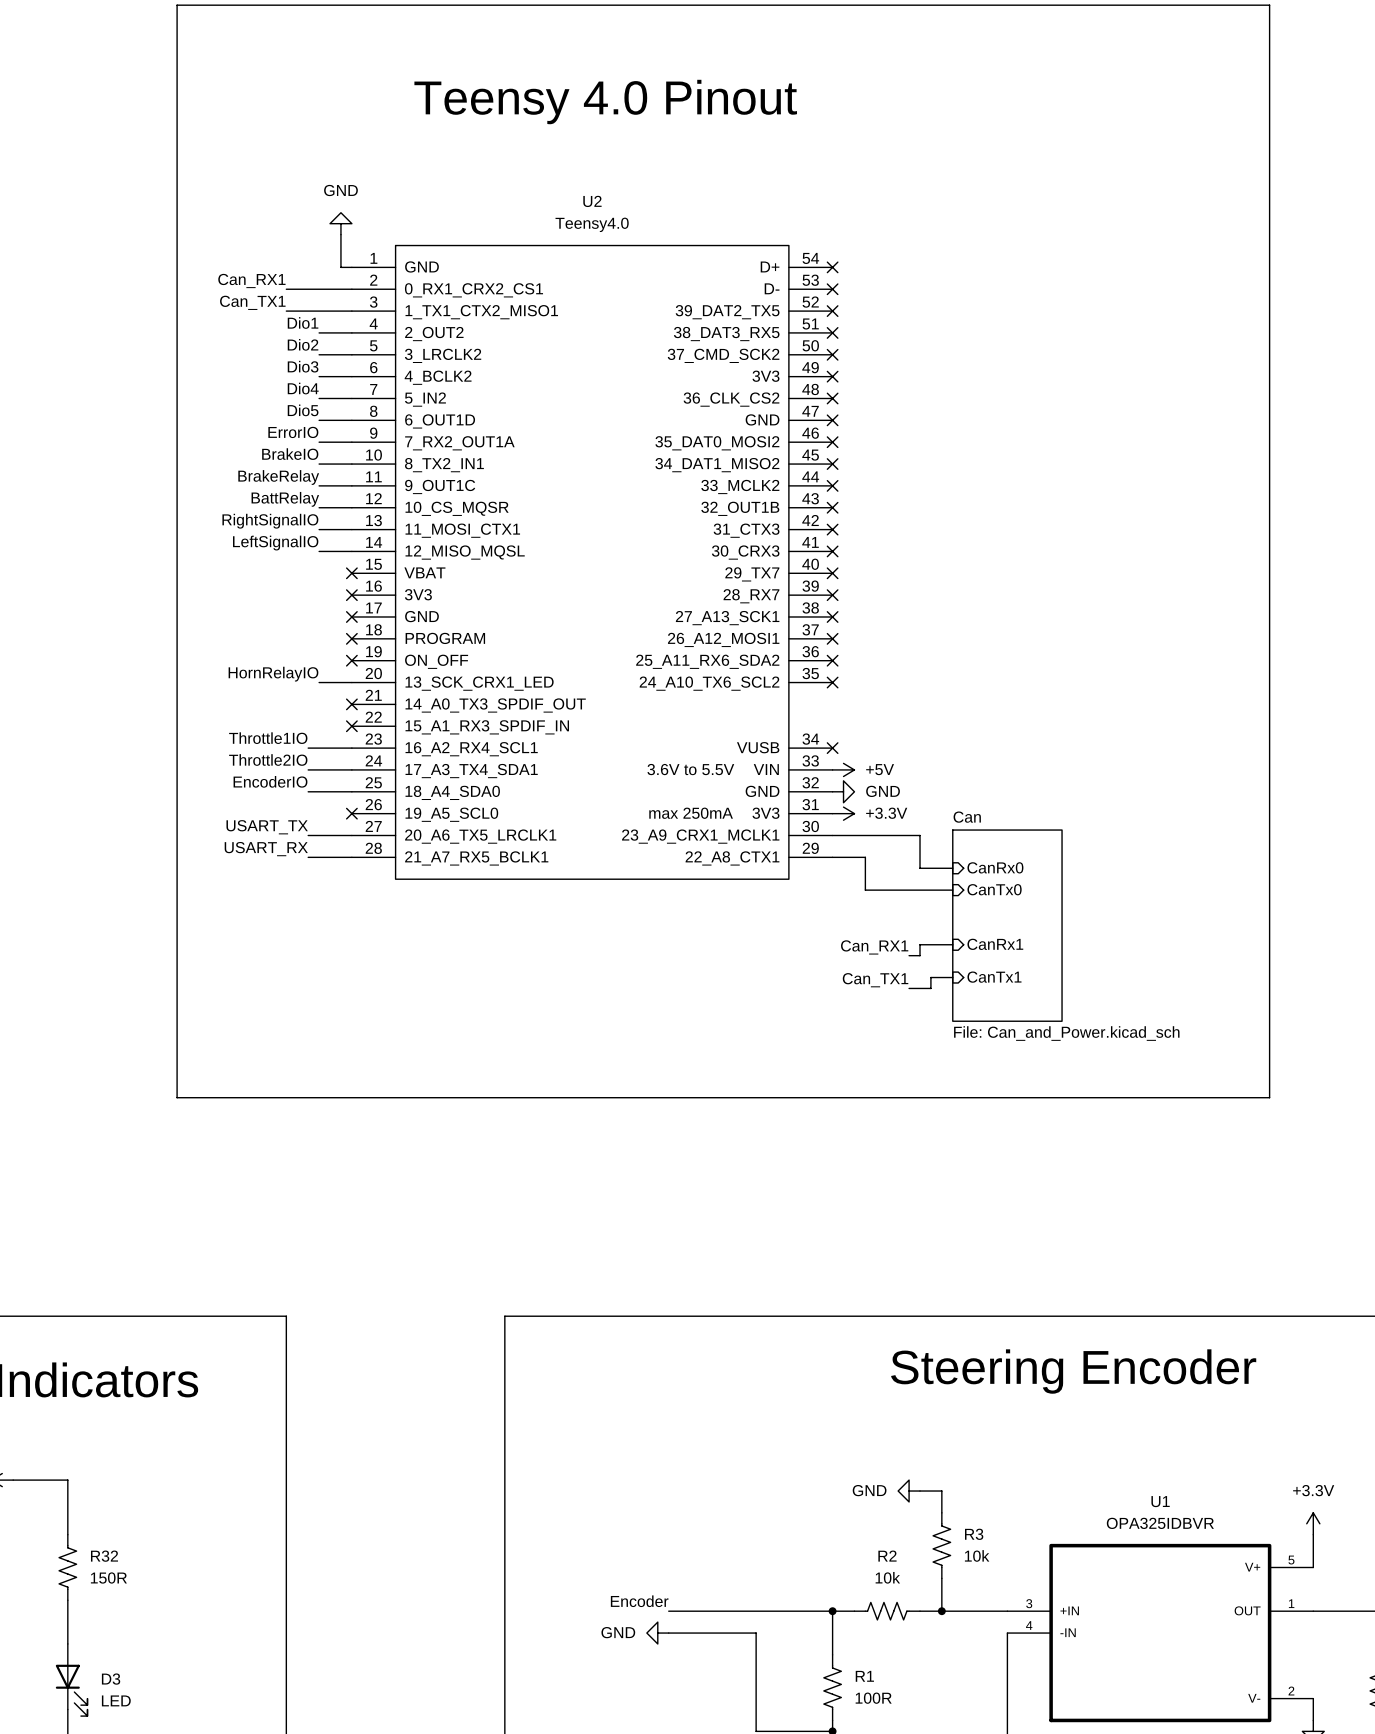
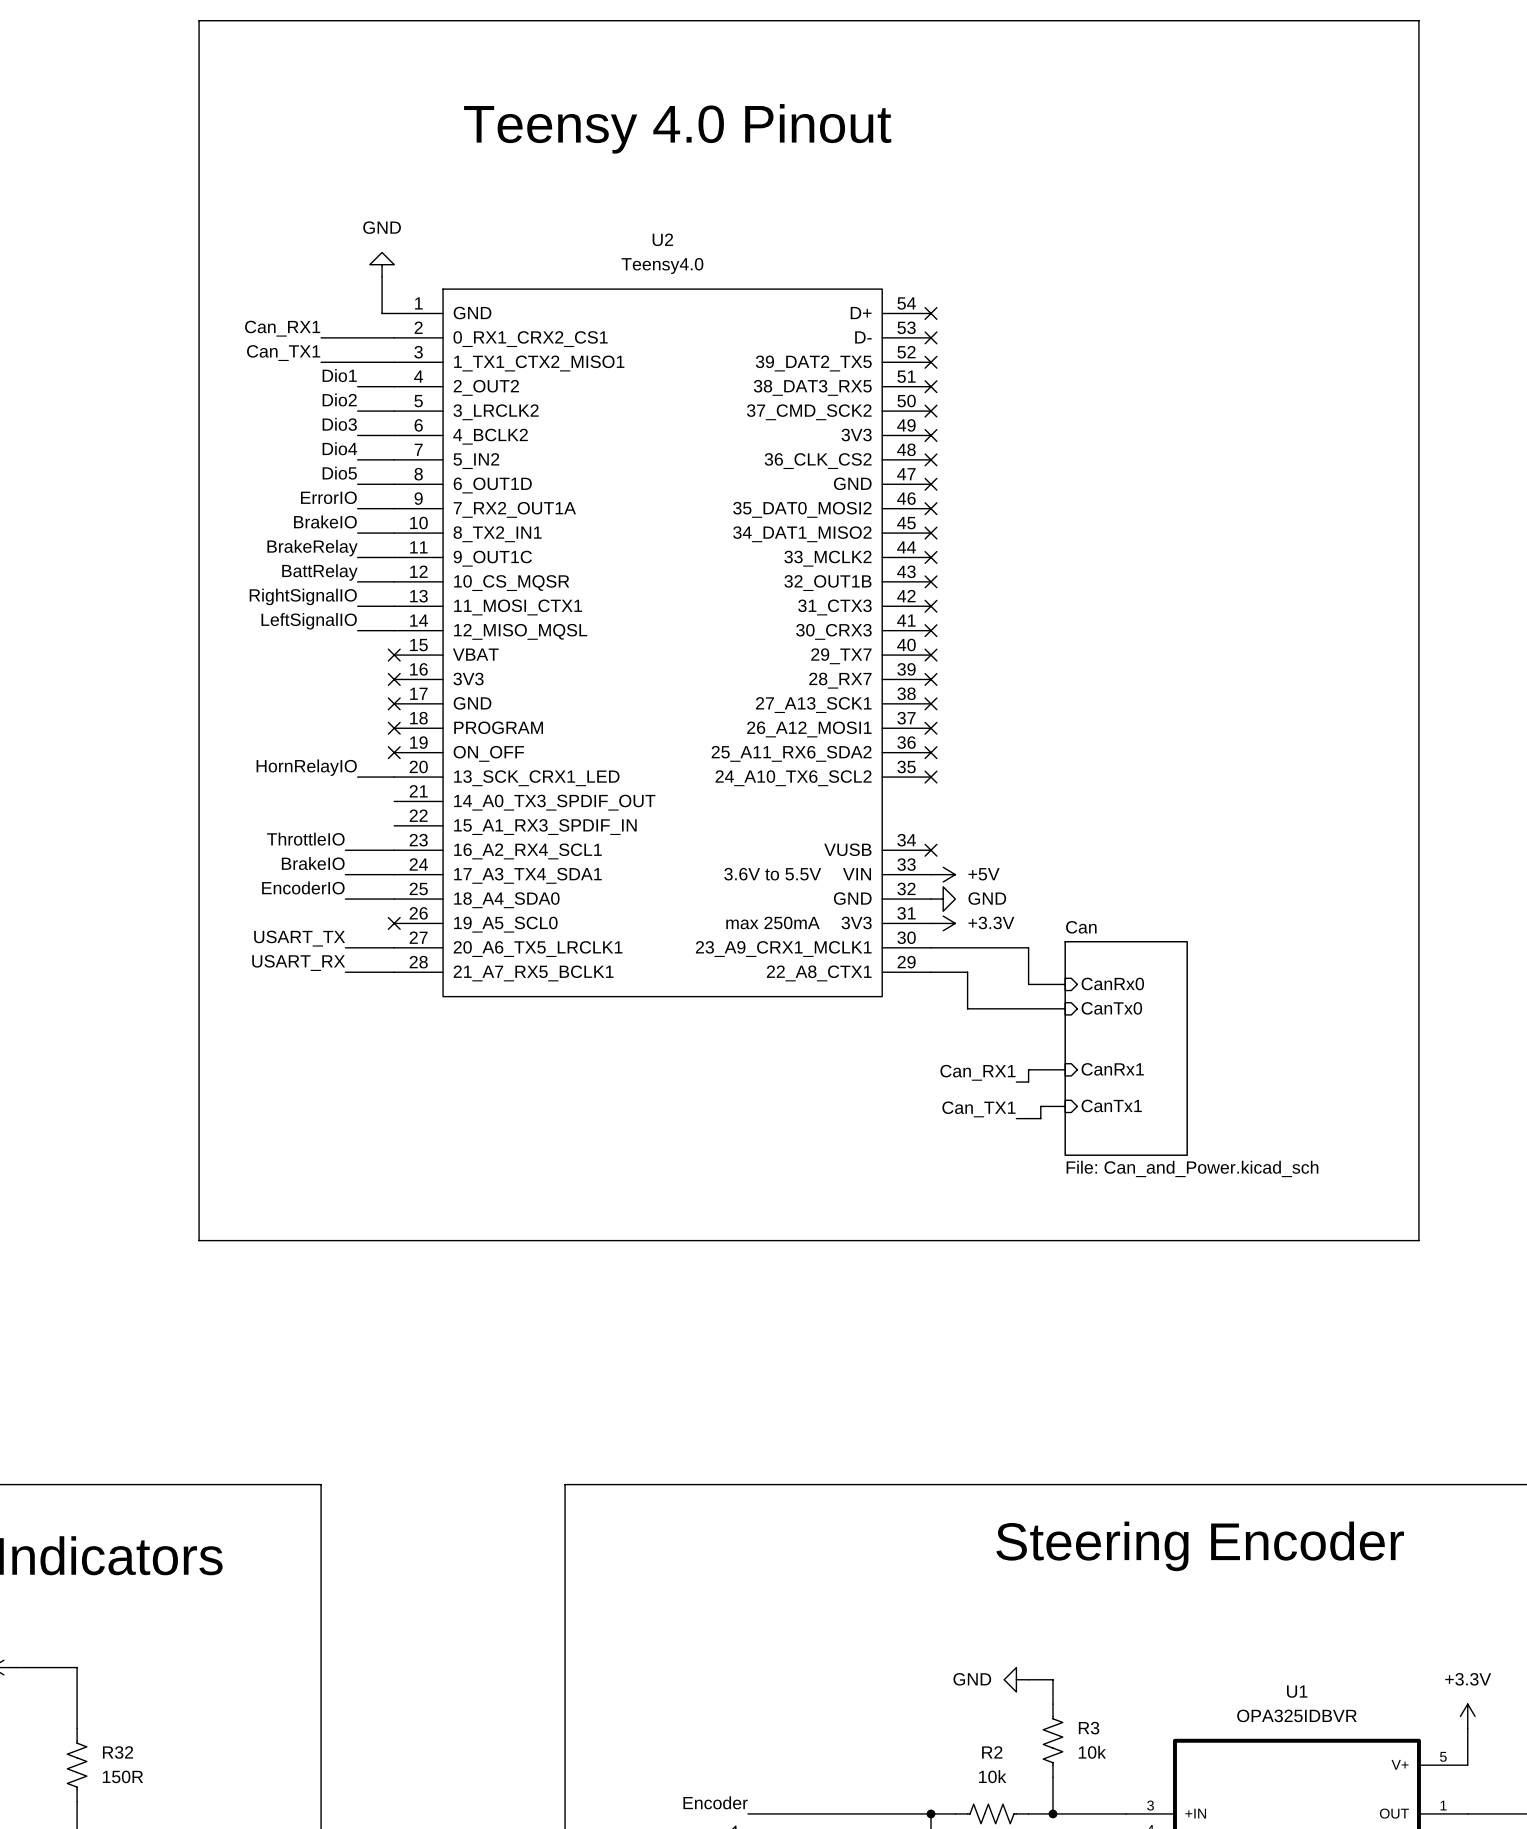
no-connect mark: (351, 704) -> none
no-connect mark: (351, 726) -> none
label: Throttle1IO (268, 738) -> ThrottleIO (305, 839)
label: Throttle2IO (268, 759) -> BrakeIO (313, 863)

